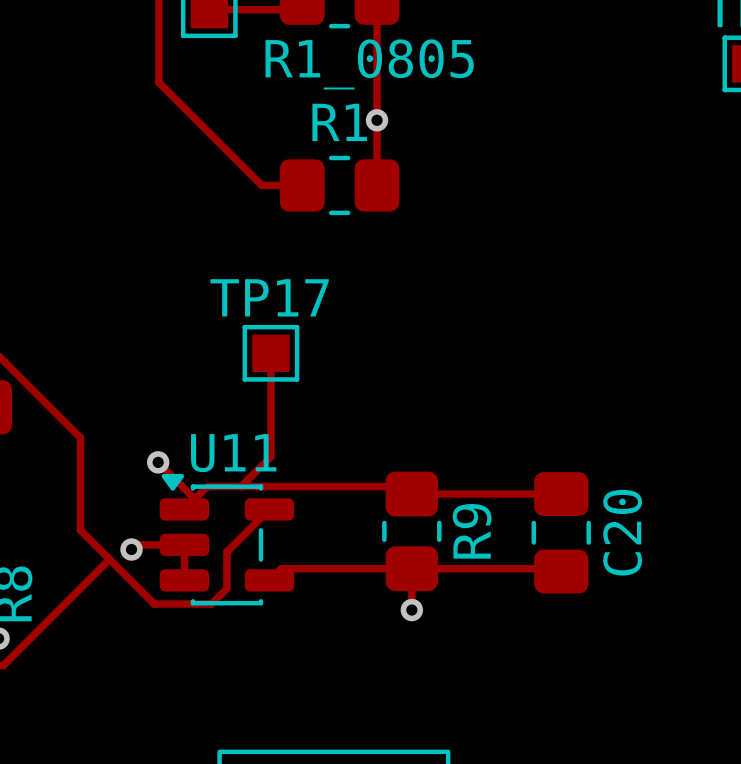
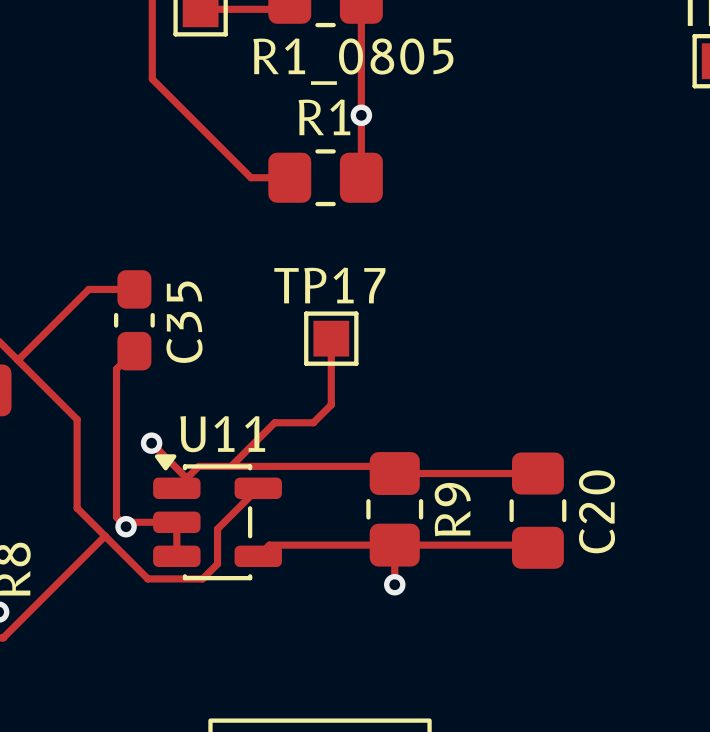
track: none -> (134, 289) (88, 289) (17, 360)
C35: none -> (134, 320)
track: (270, 353) (270, 456) -> (331, 338) (331, 404) (313, 422) (274, 422) (259, 437)
TP17 position: (270, 353) -> (331, 338)
track: none -> (134, 351) (116, 369) (116, 517) (126, 526)

